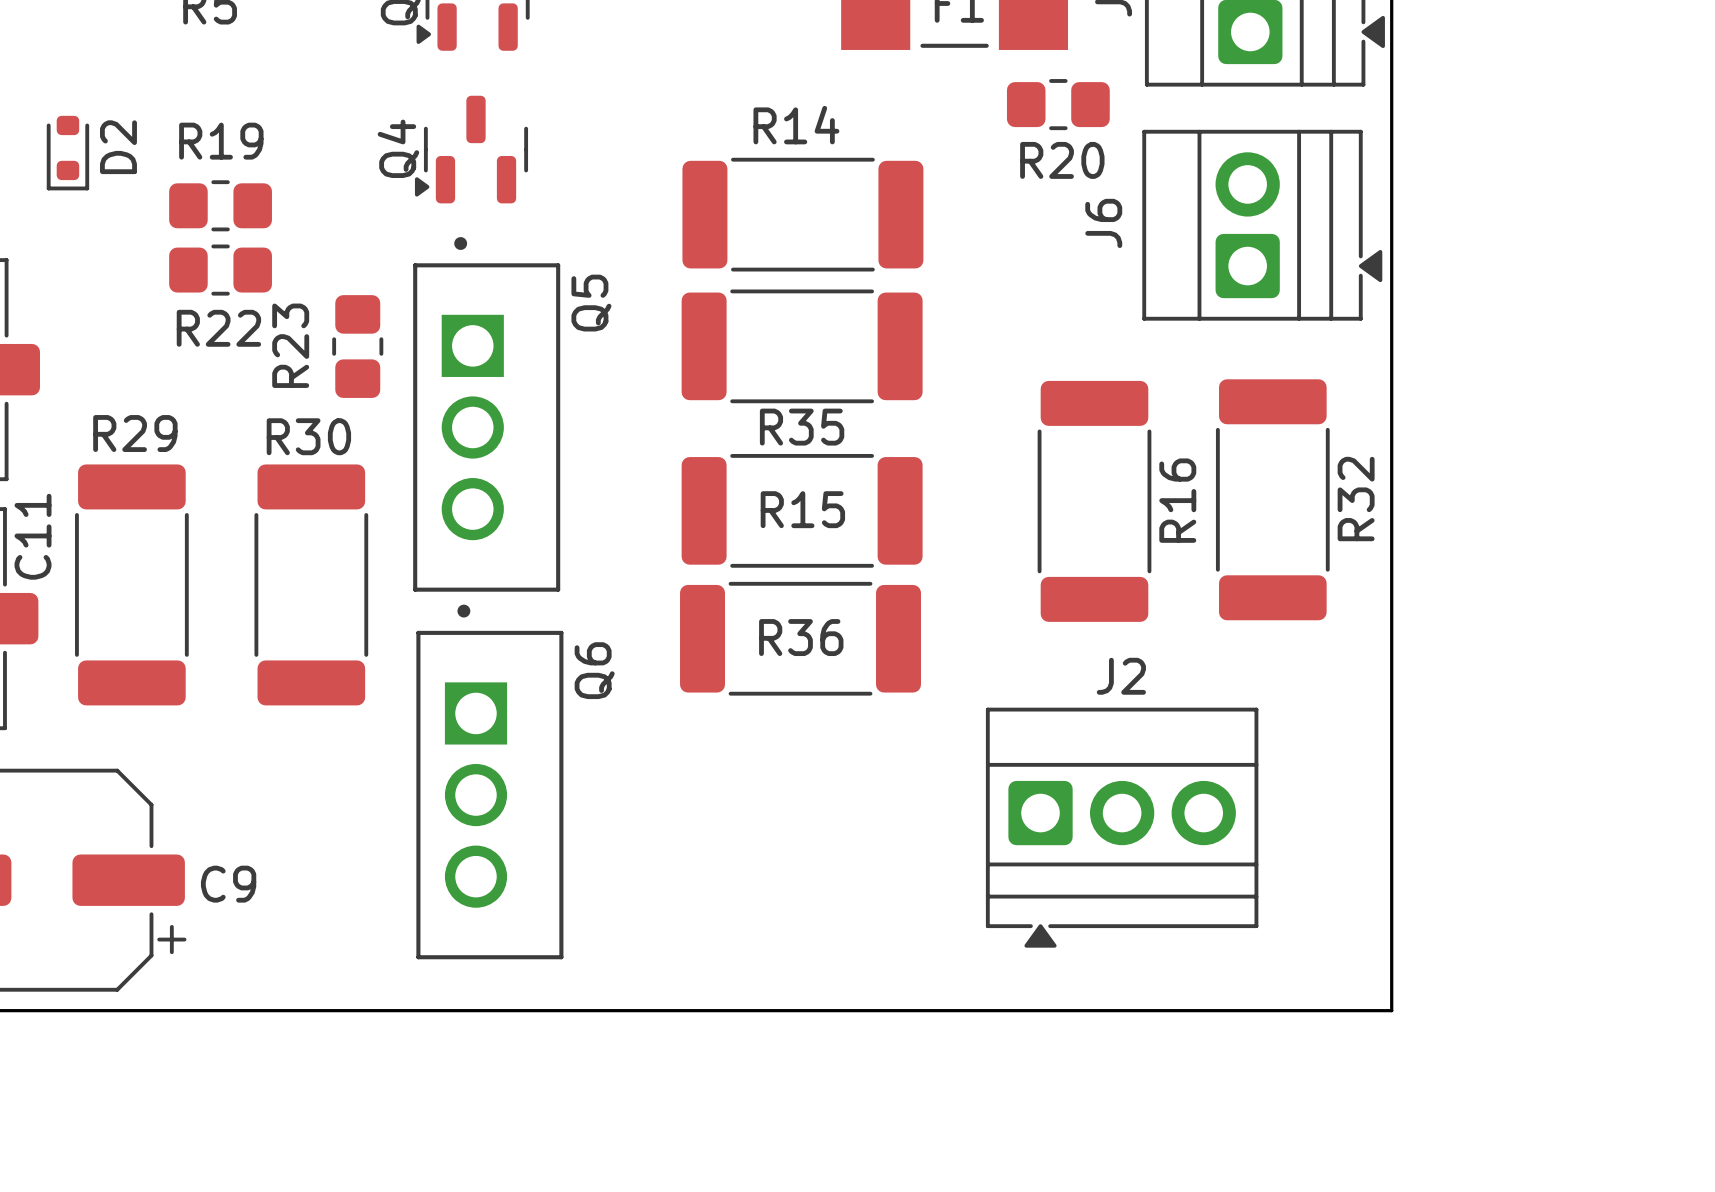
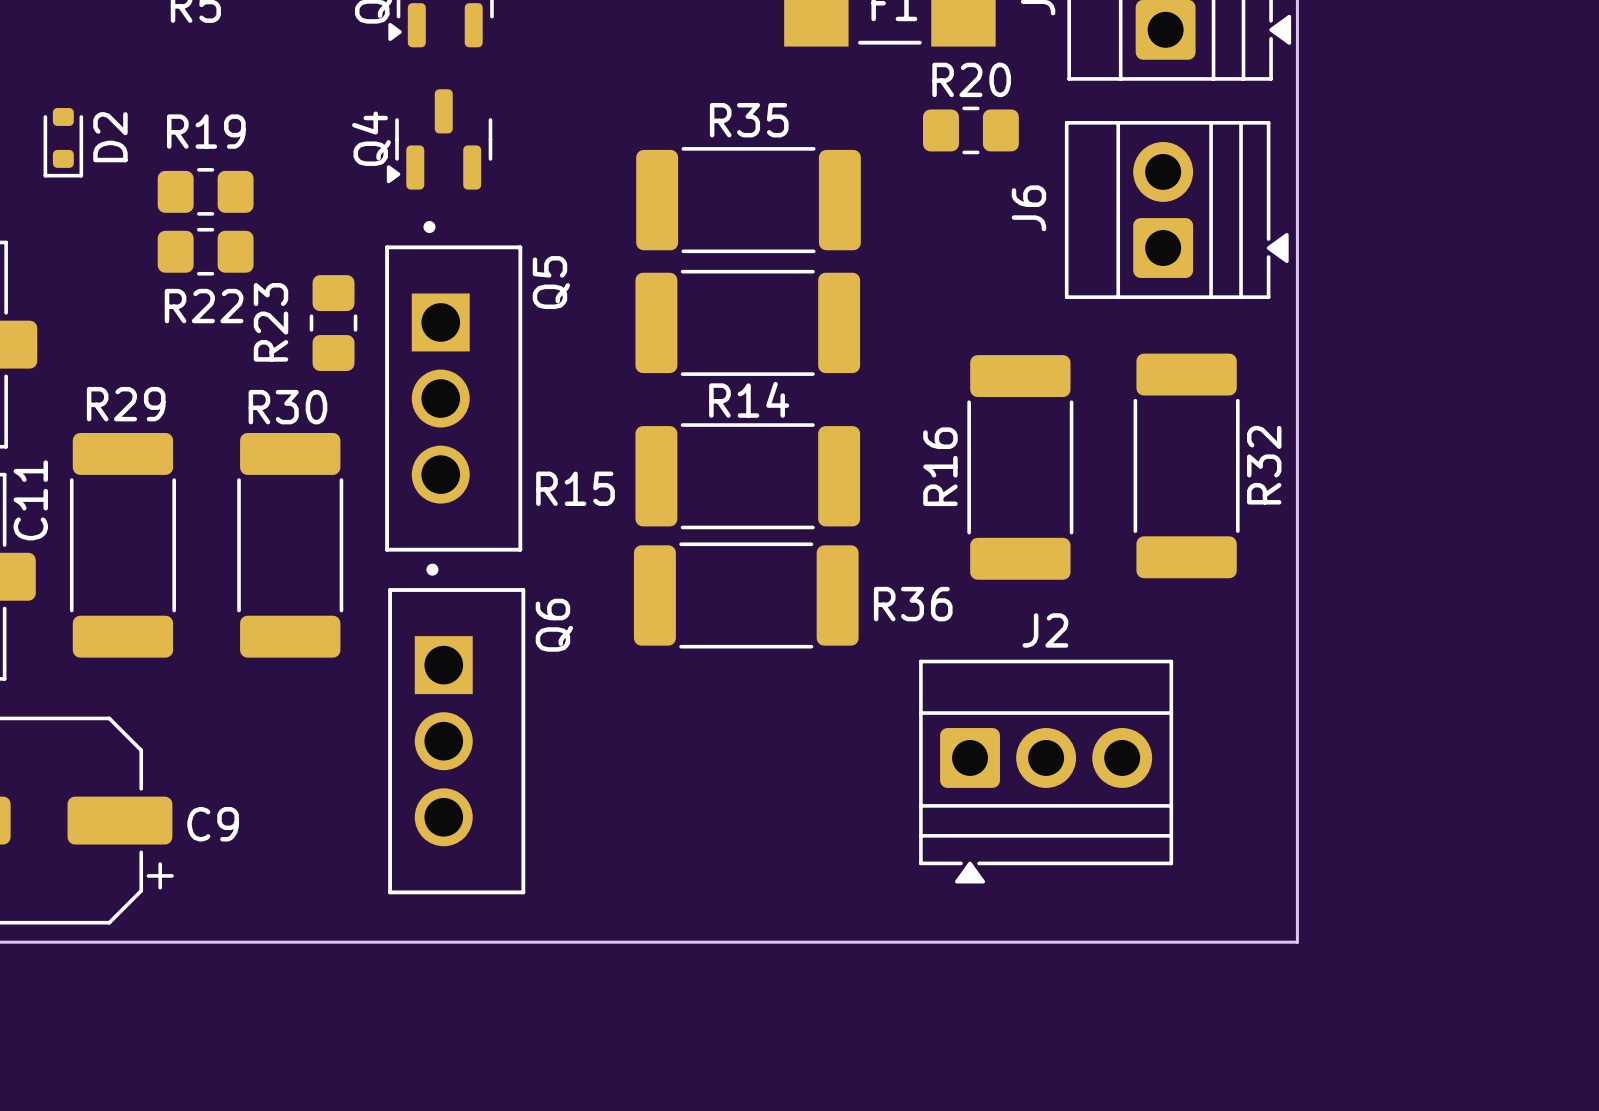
R20 position: (1058, 104) -> (970, 130)
R14 name: R14 (796, 125) -> R35 (749, 120)
R20 name position: R20 (1062, 160) -> R20 (971, 79)
R35 name: R35 (802, 427) -> R14 (749, 399)
R16 name position: R16 (1177, 500) -> R16 (940, 466)
R15 name position: R15 (802, 509) -> R15 (575, 488)
R36 name position: R36 (801, 637) -> R36 (913, 604)

